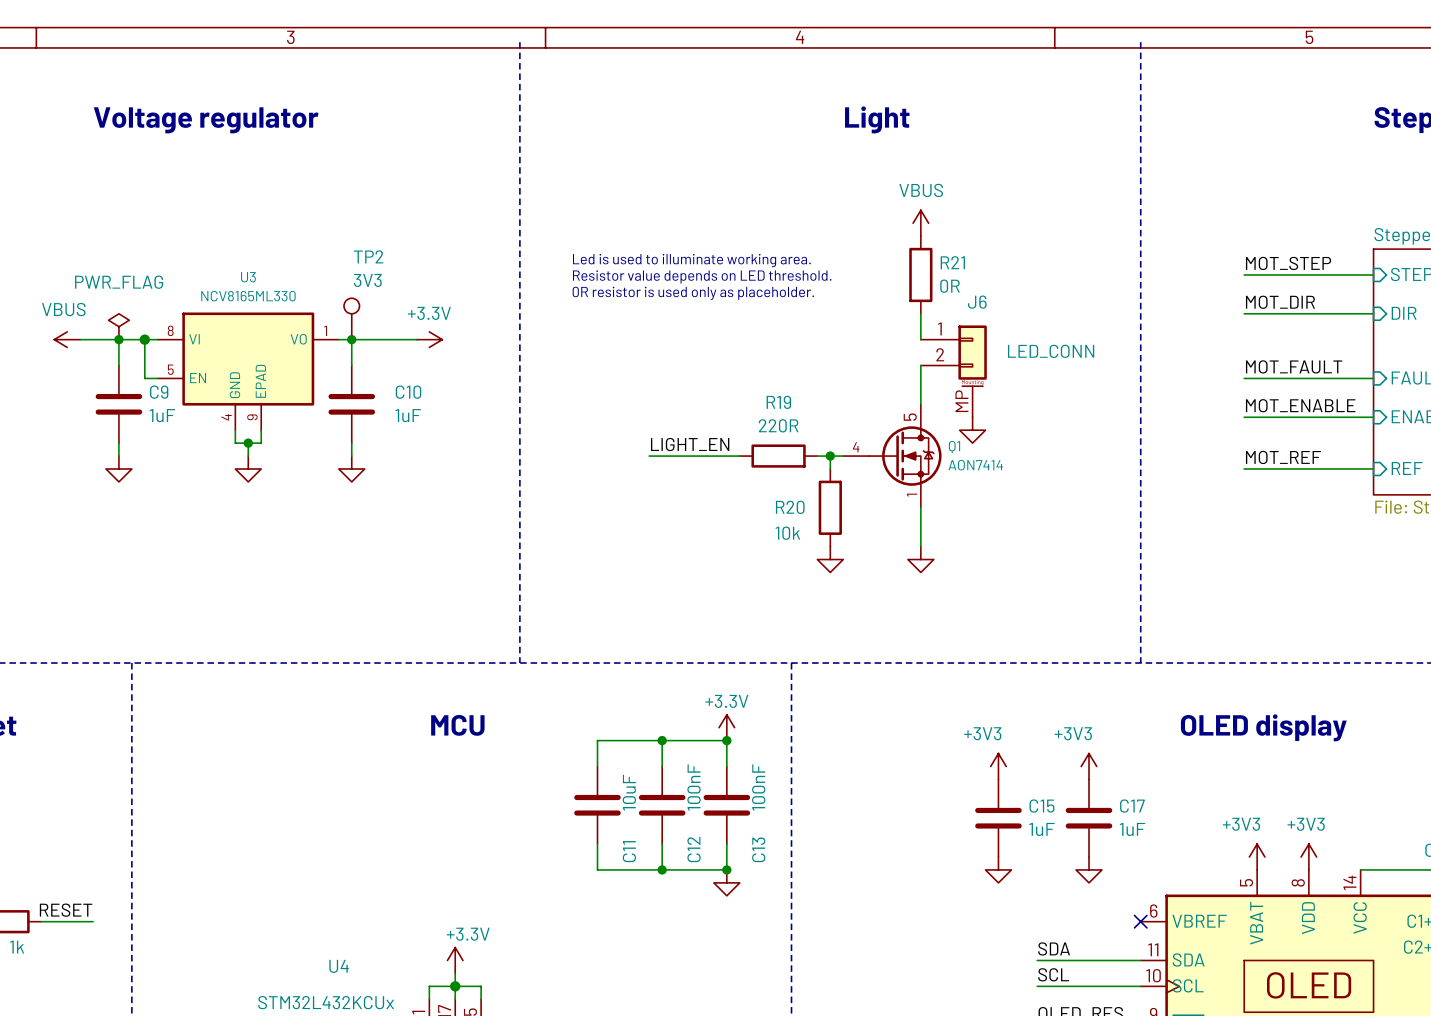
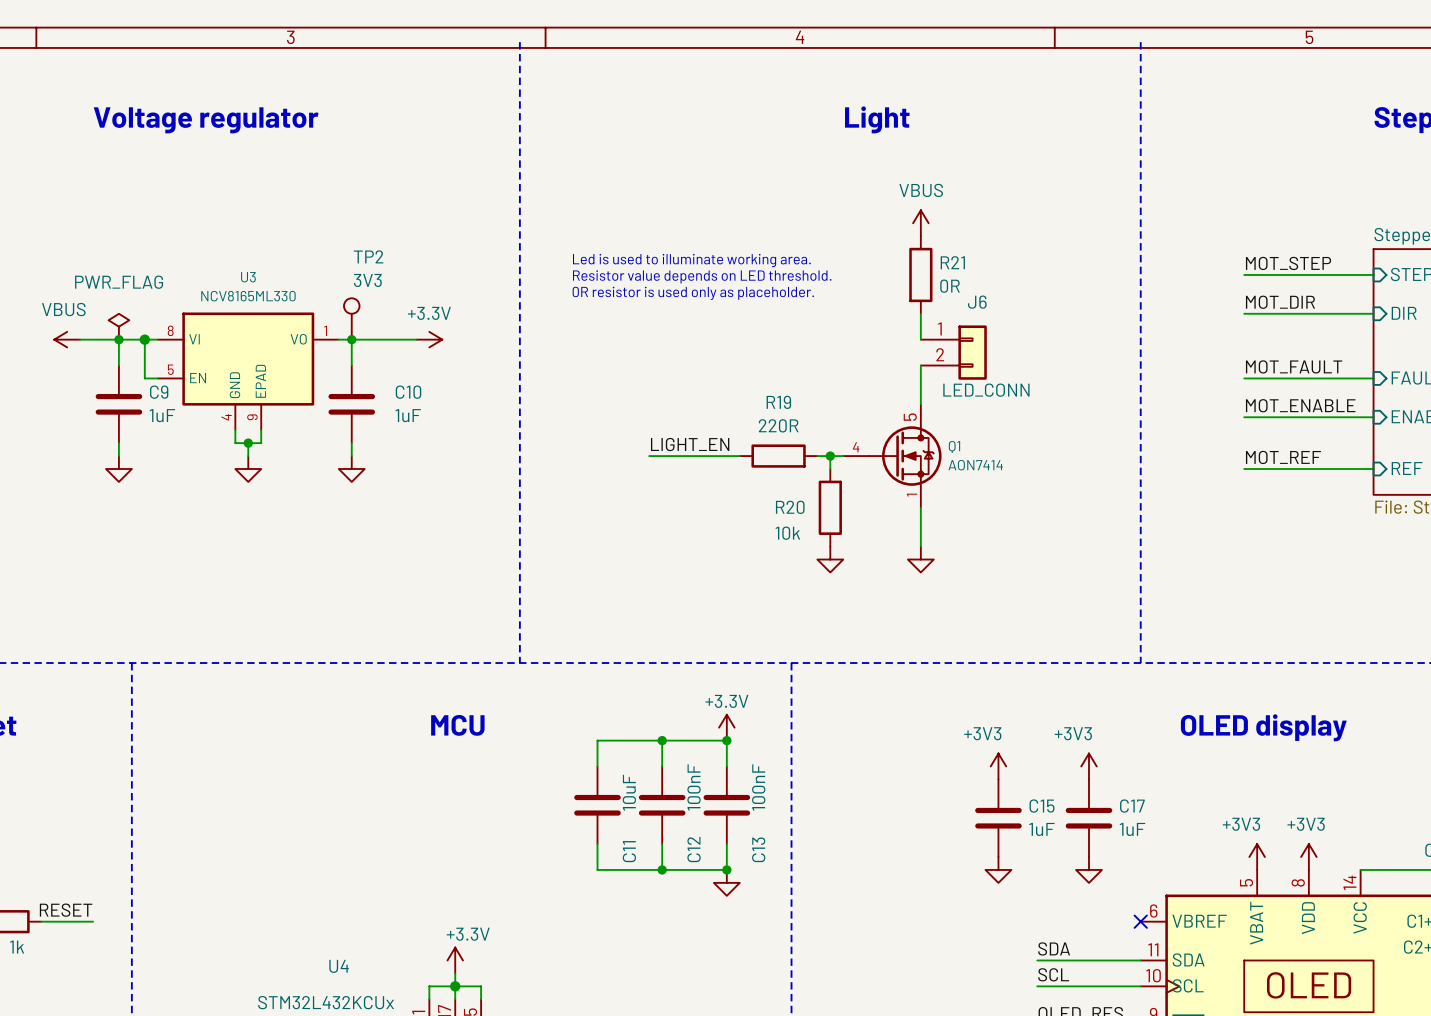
J6 symbol: [920, 325, 987, 418] -> [920, 325, 987, 380]
J6 value position: LED_CONN (1051, 351) -> LED_CONN (986, 390)
power symbol: (972, 430) -> none

